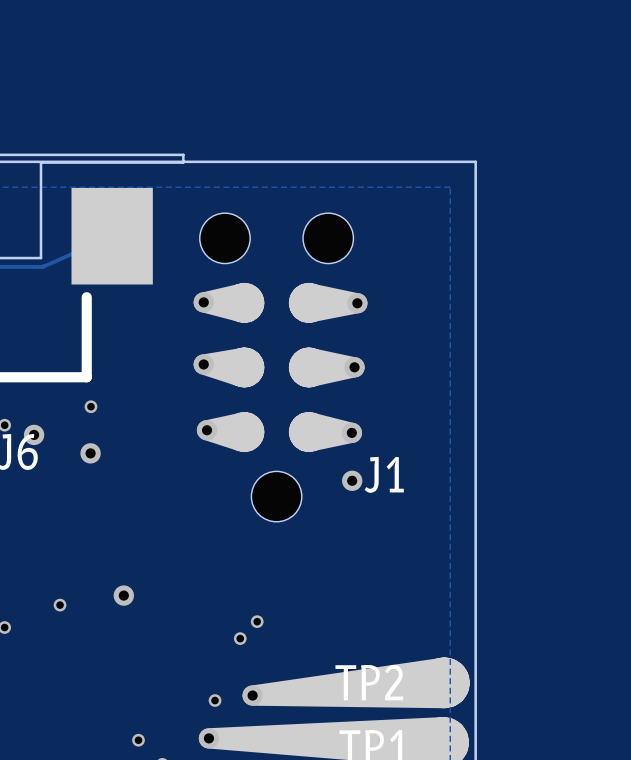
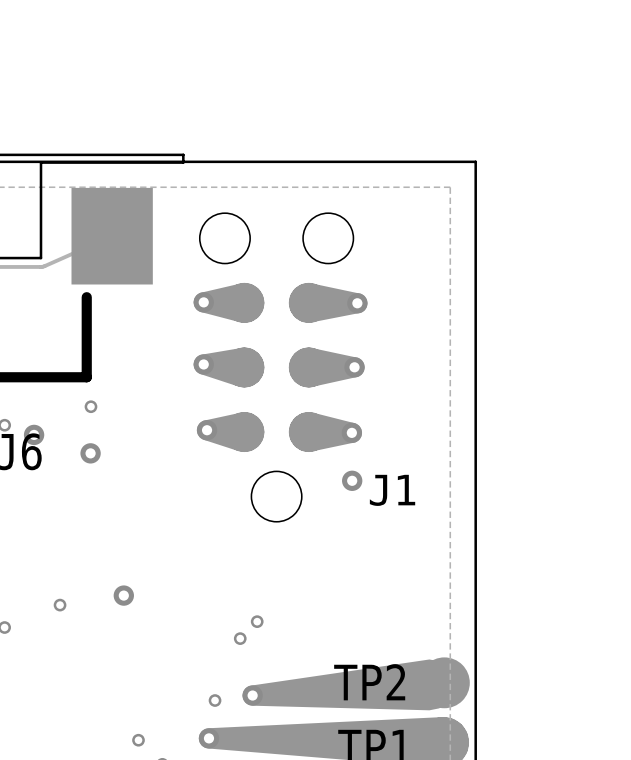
J1 name position: J1 (384, 474) -> J1 (392, 490)
part footprint: [242, 657, 470, 709] -> [242, 659, 455, 711]

